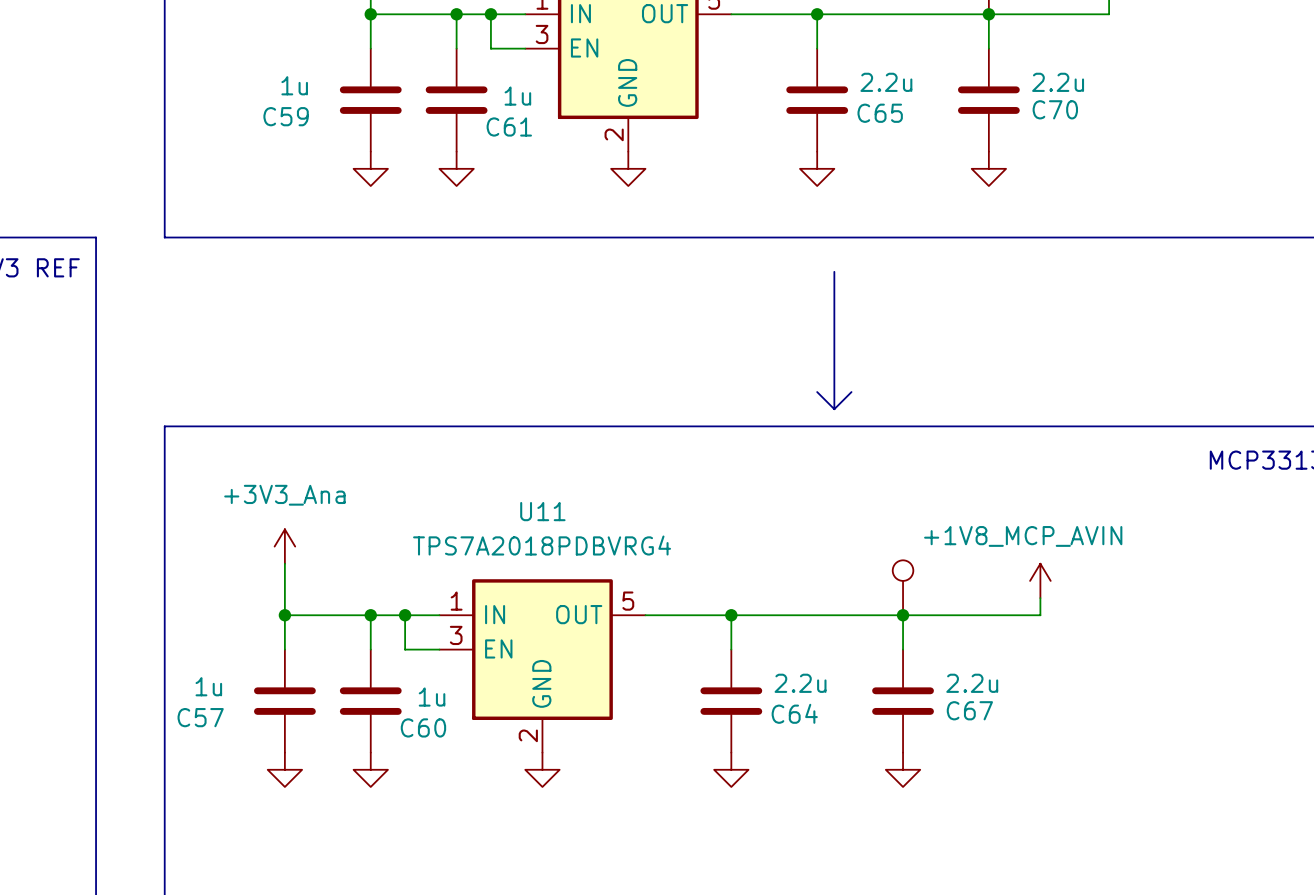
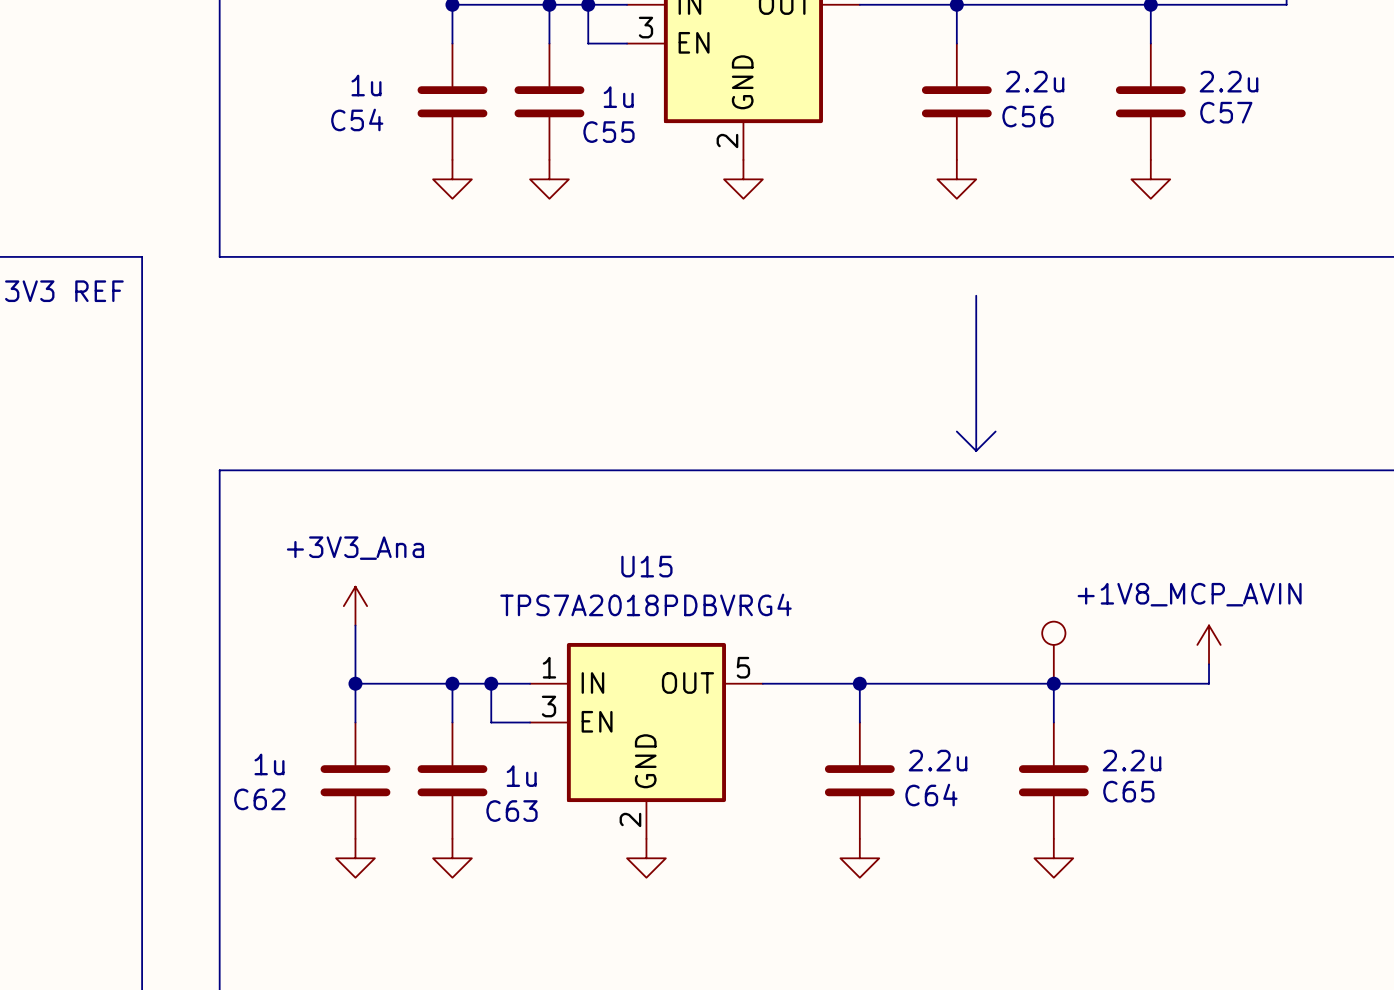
C70 name: C70 (1055, 109) -> C57 (1226, 112)
C65 name: C65 (880, 113) -> C56 (1027, 116)
C59 name: C59 (286, 116) -> C54 (357, 119)
C61 name: C61 (509, 126) -> C55 (608, 132)
U11 name: U11 (542, 511) -> U15 (646, 566)
C67 name: C67 (969, 710) -> C65 (1128, 791)
C57 name: C57 (200, 717) -> C62 (259, 799)
C60 name: C60 (423, 727) -> C63 (511, 811)

